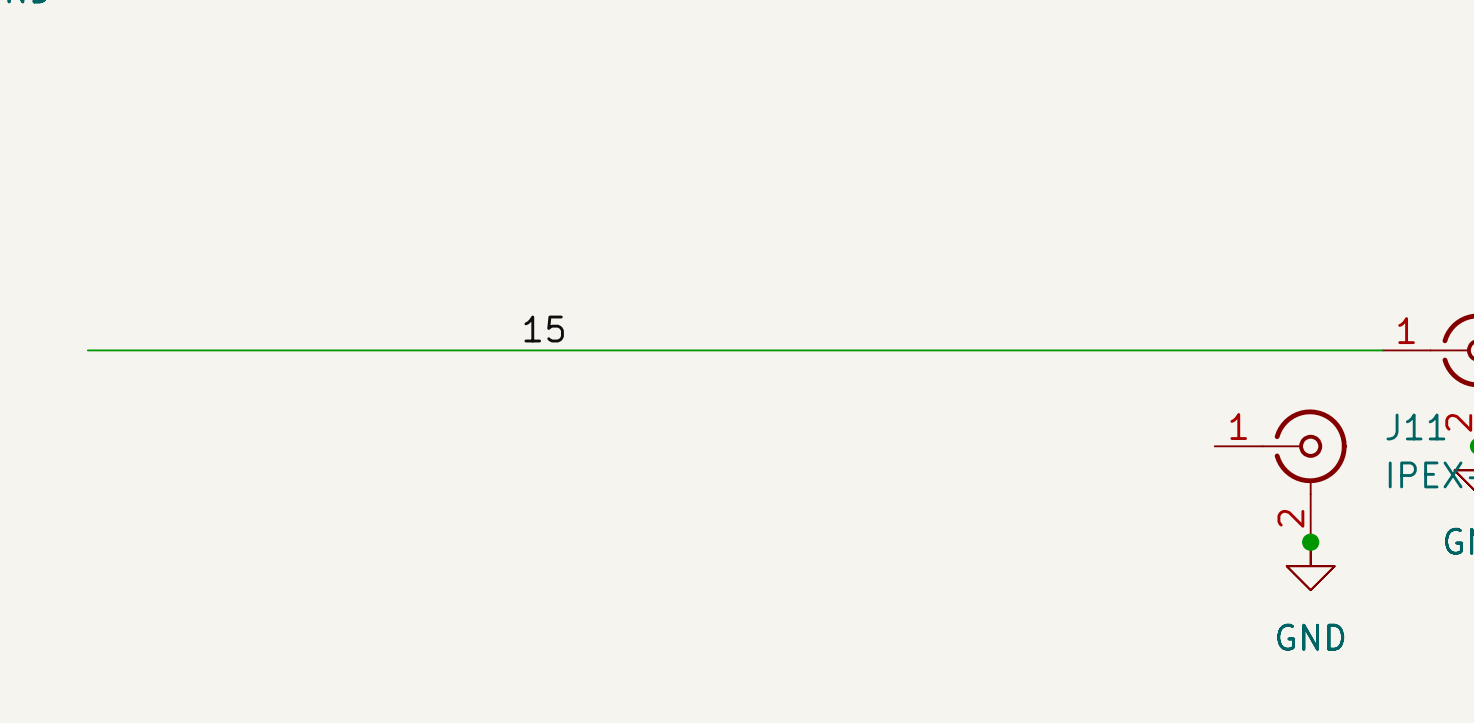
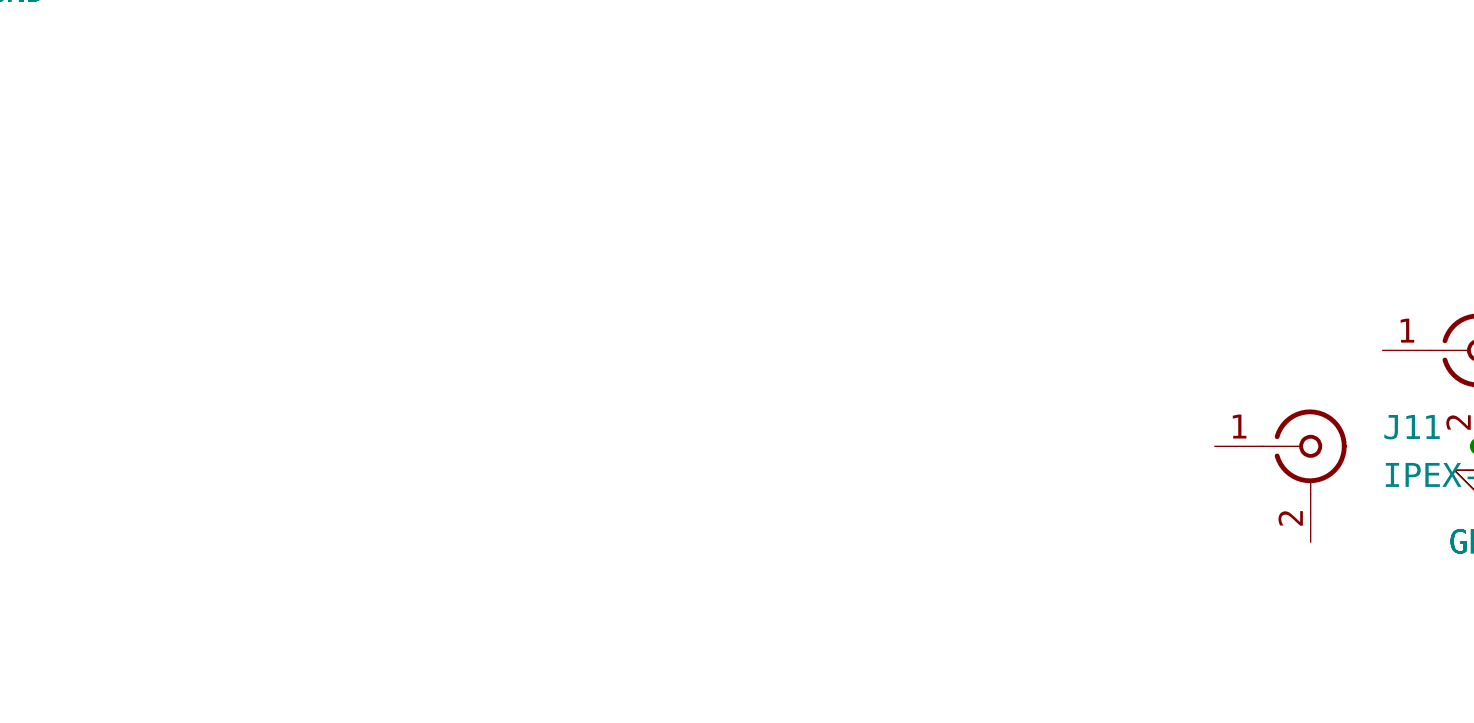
label: 15 (544, 329) -> none
wire: (87, 350) (1382, 350) -> none
junction: (1310, 542) -> none
power symbol: GND (1310, 566) -> none

